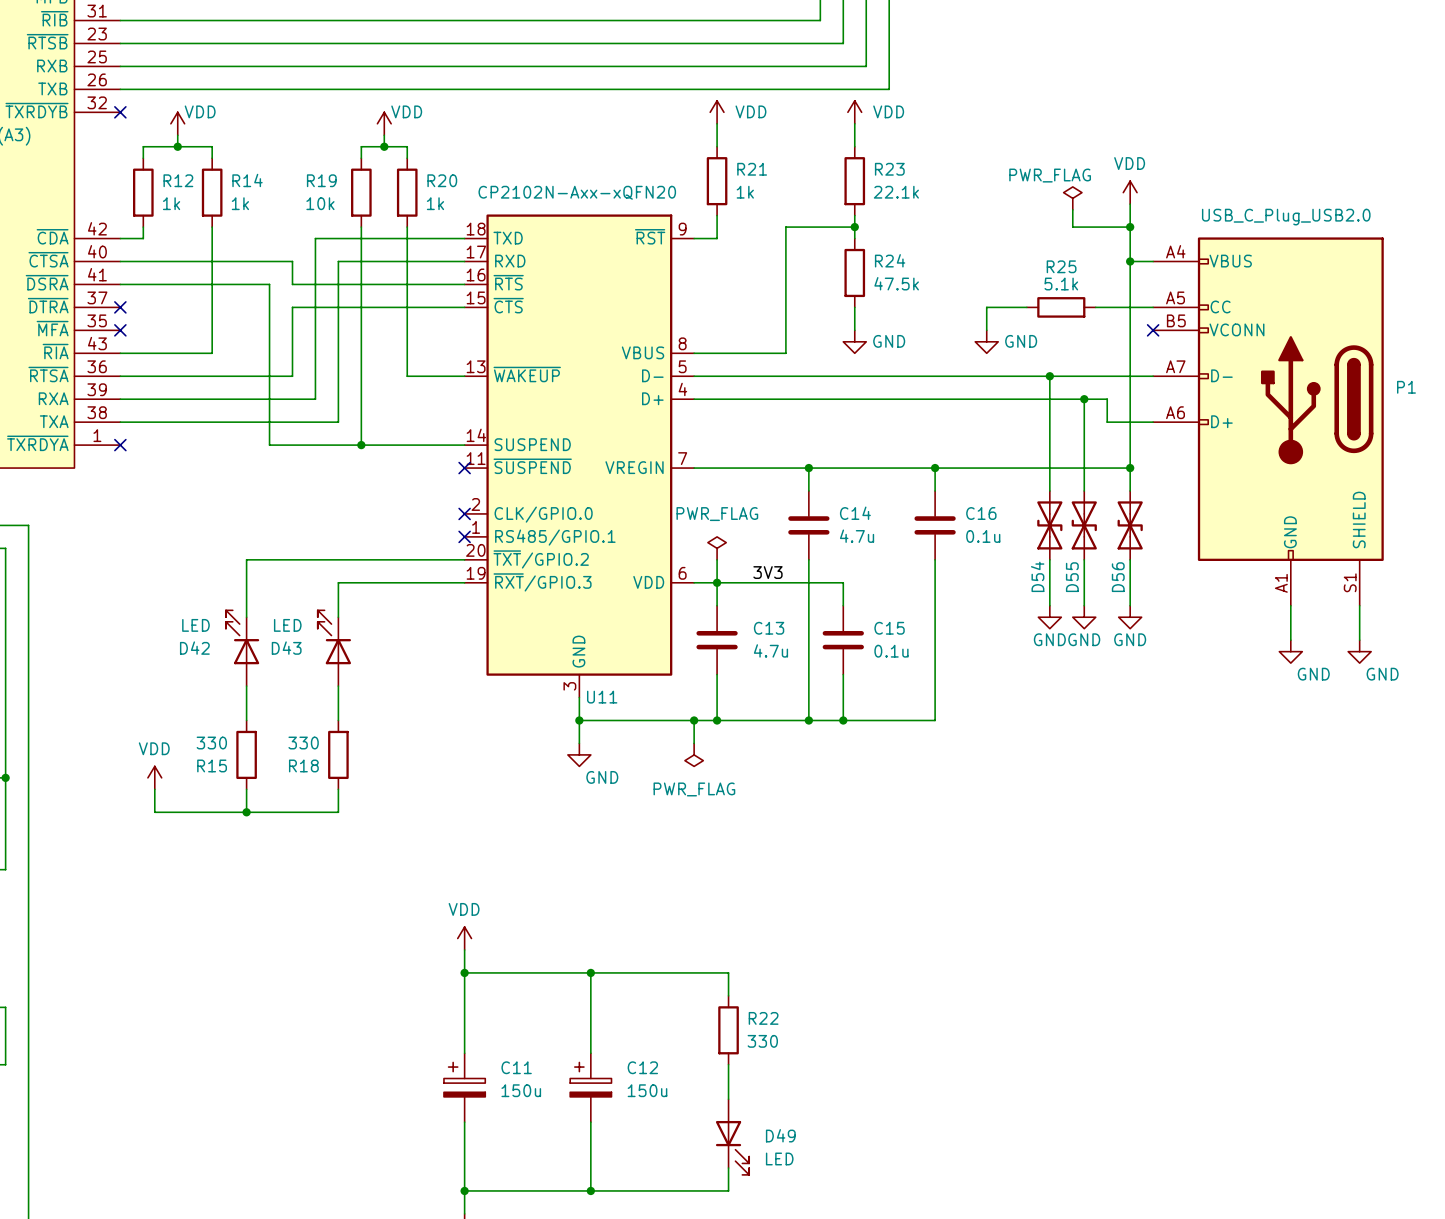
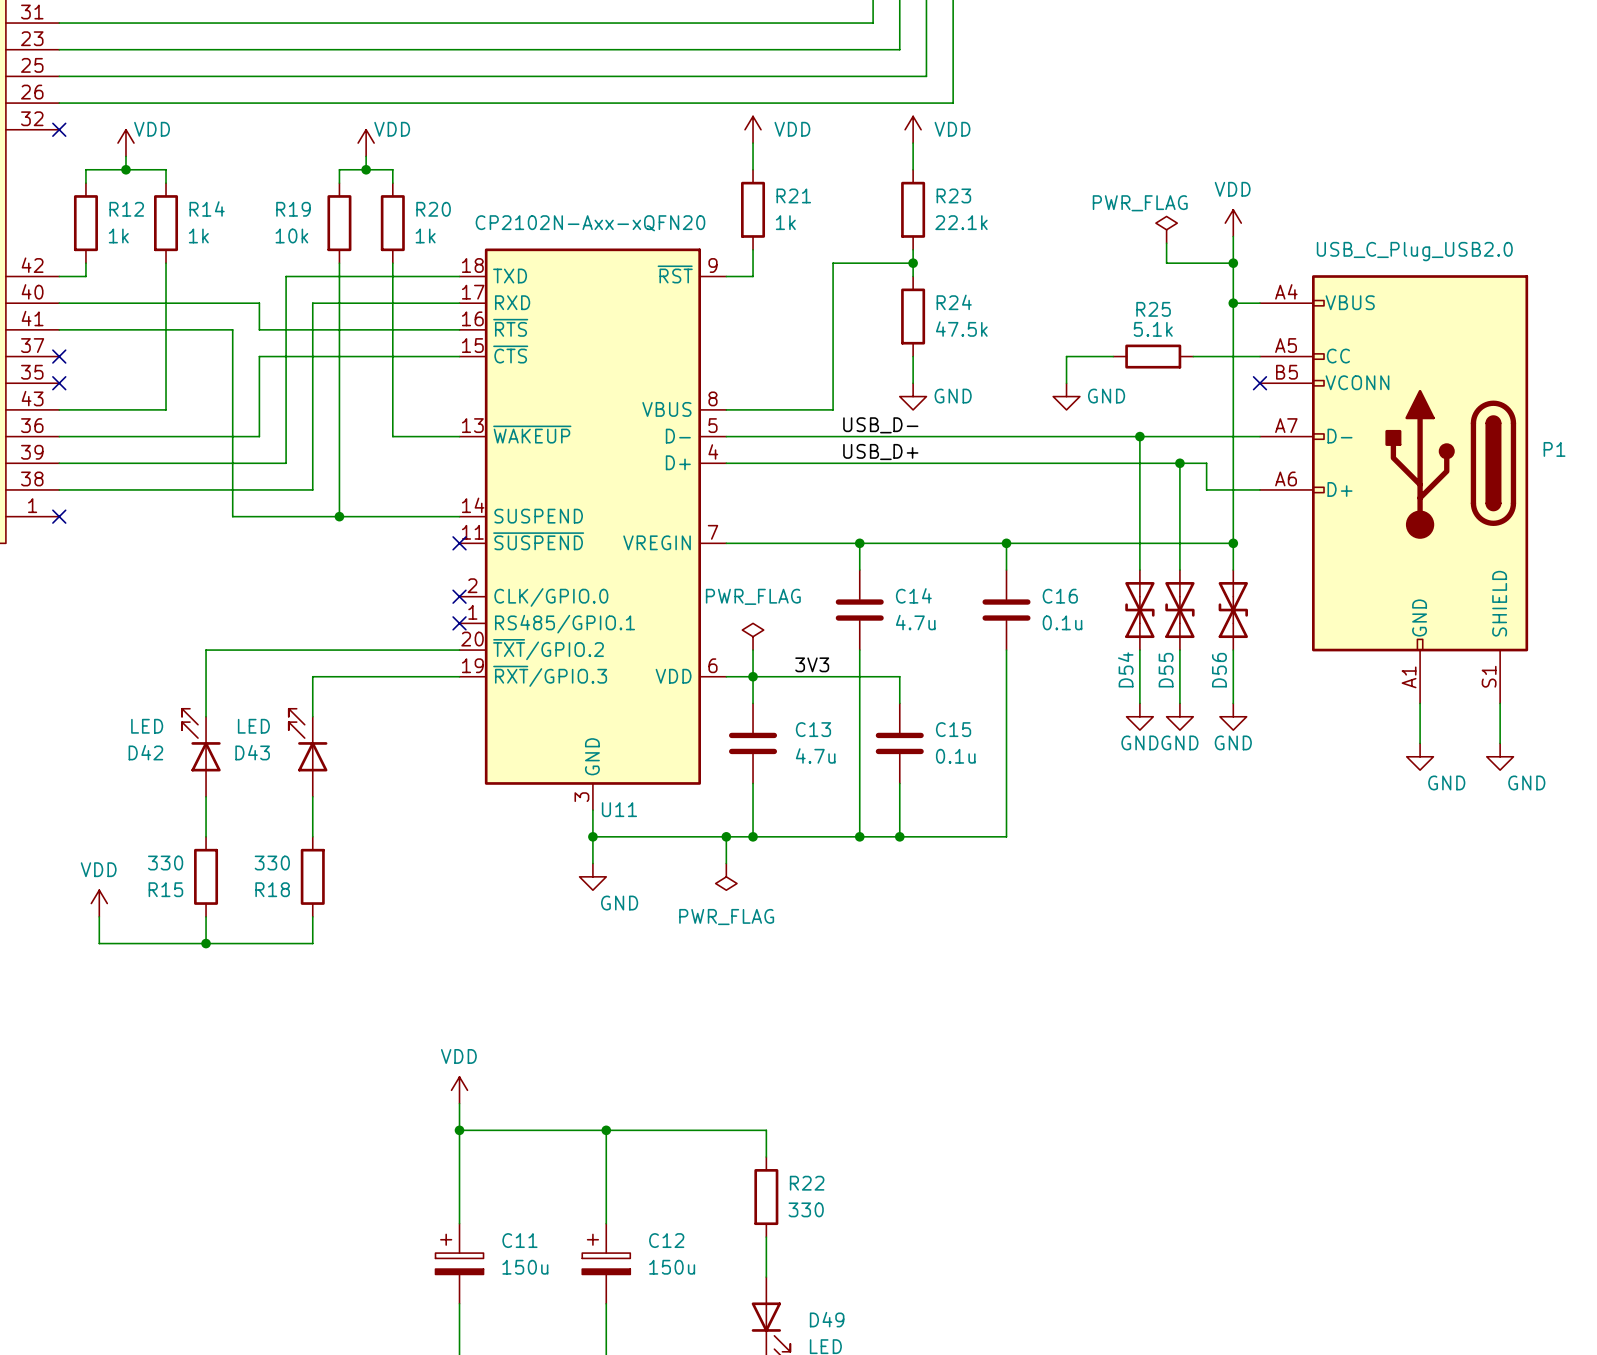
label: none -> USB_D- (880, 425)
label: none -> USB_D+ (880, 452)

